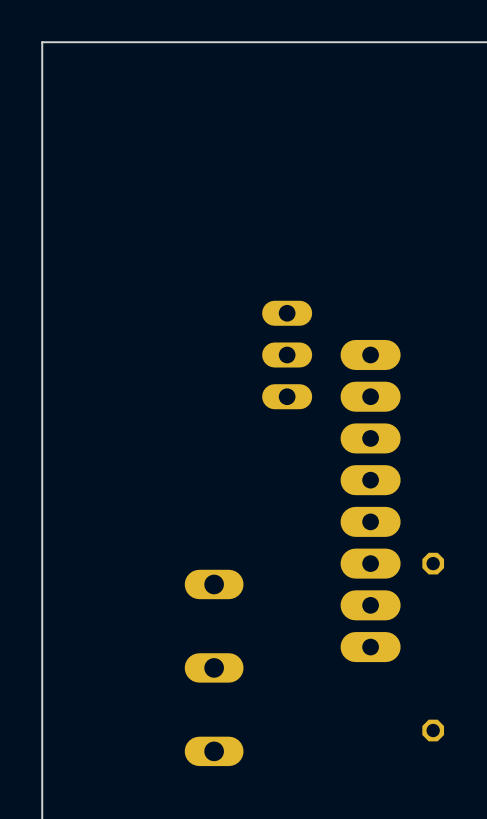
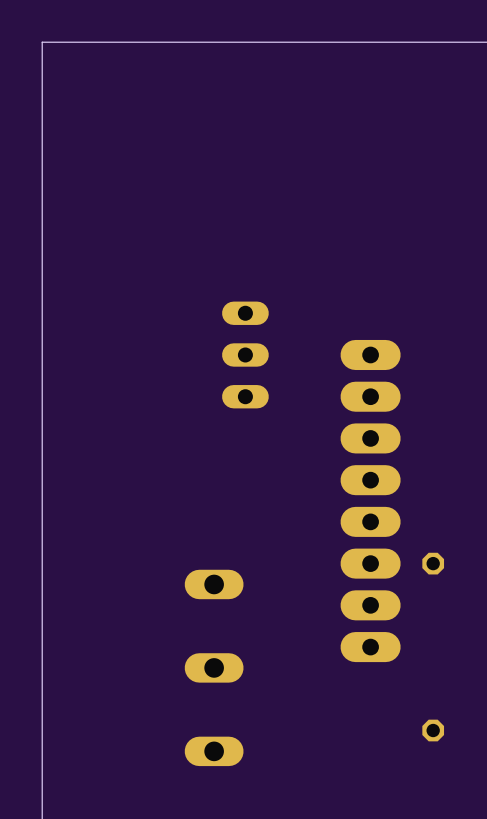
part: none -> (245, 354)
part: (287, 354) -> none

